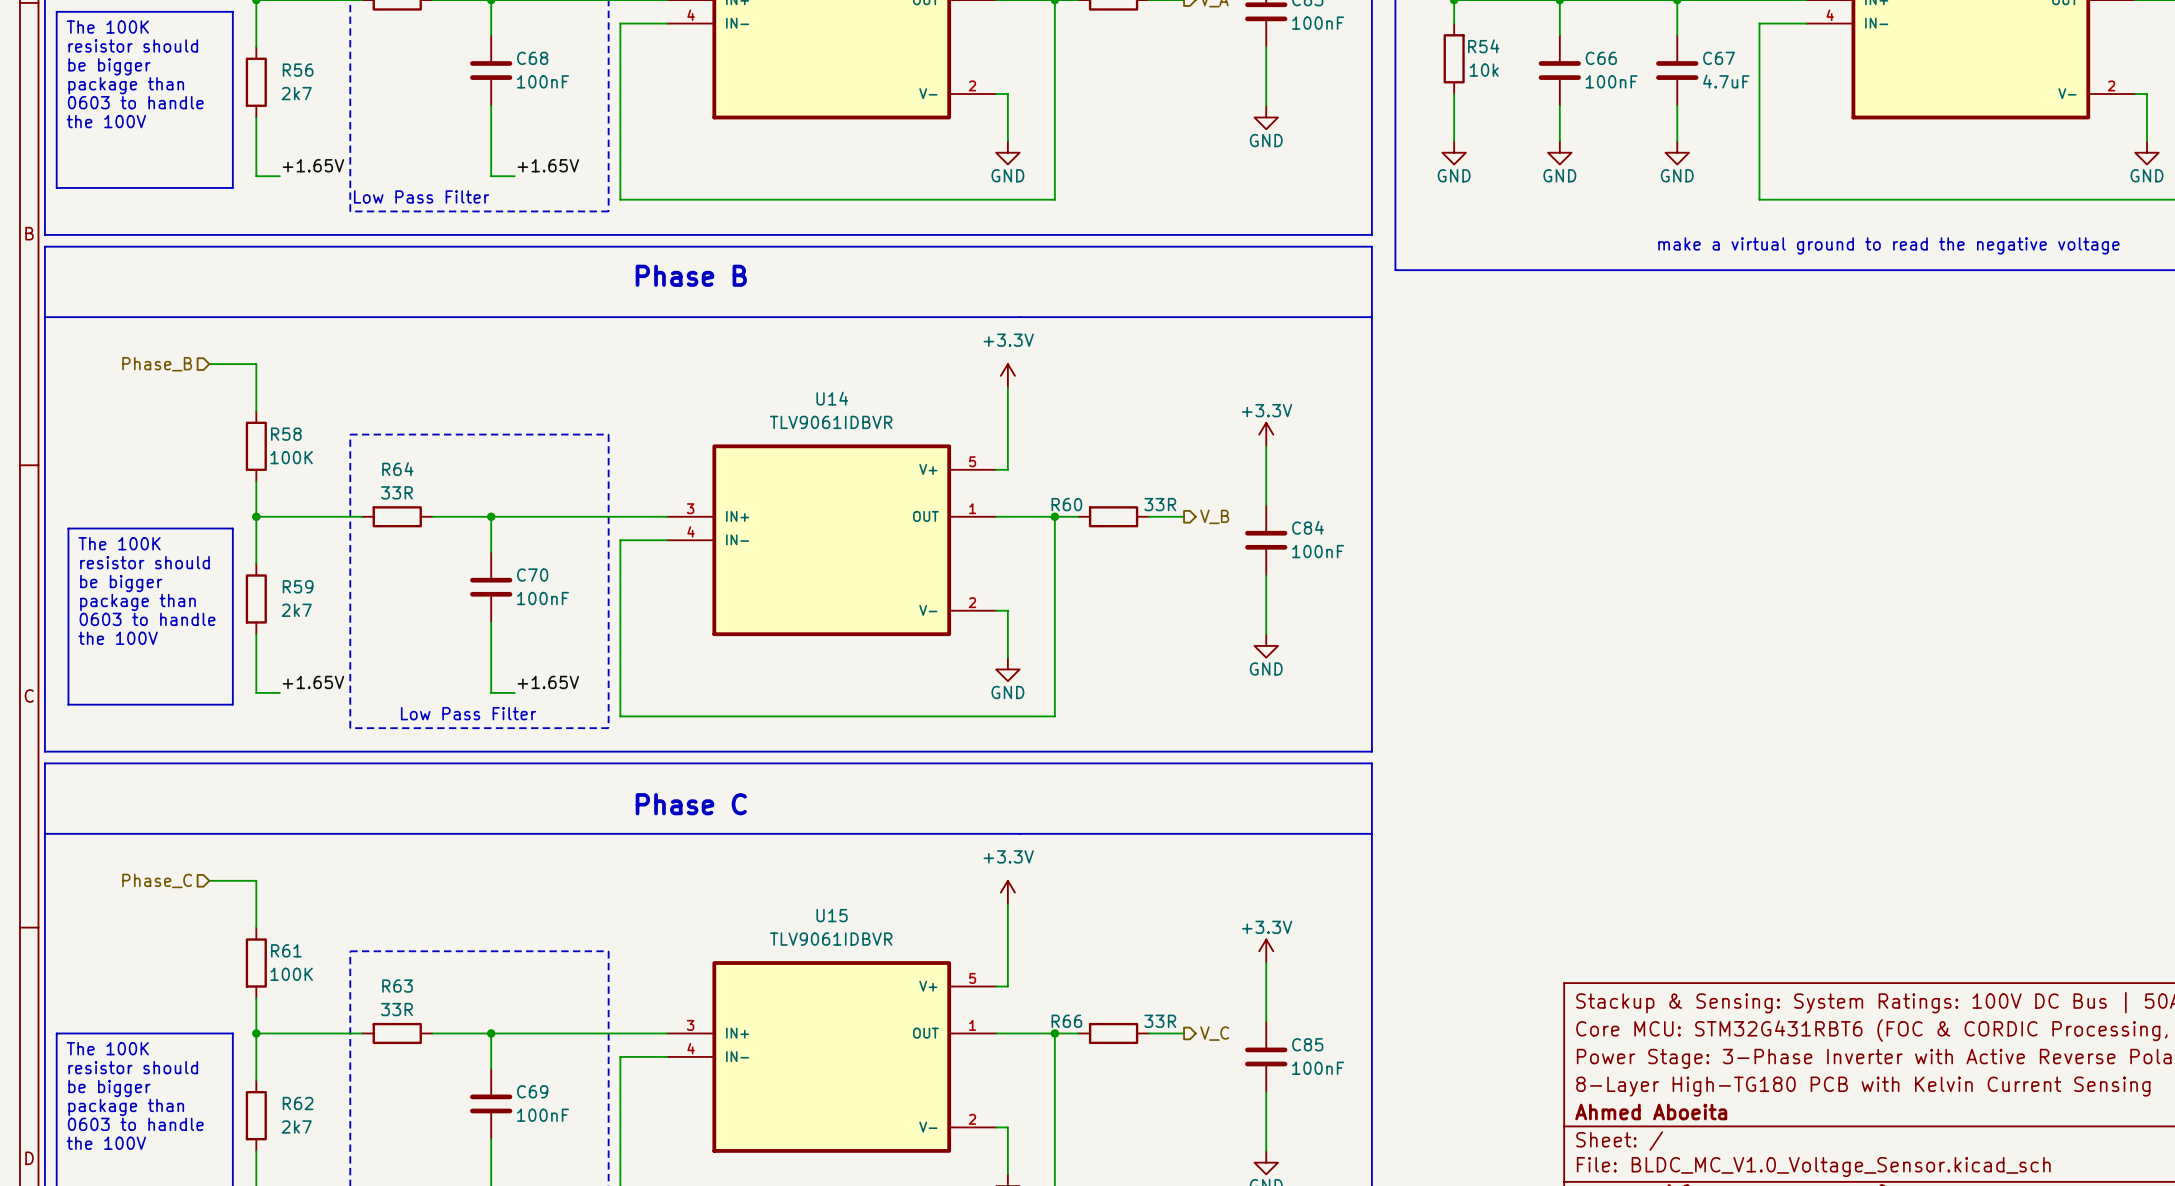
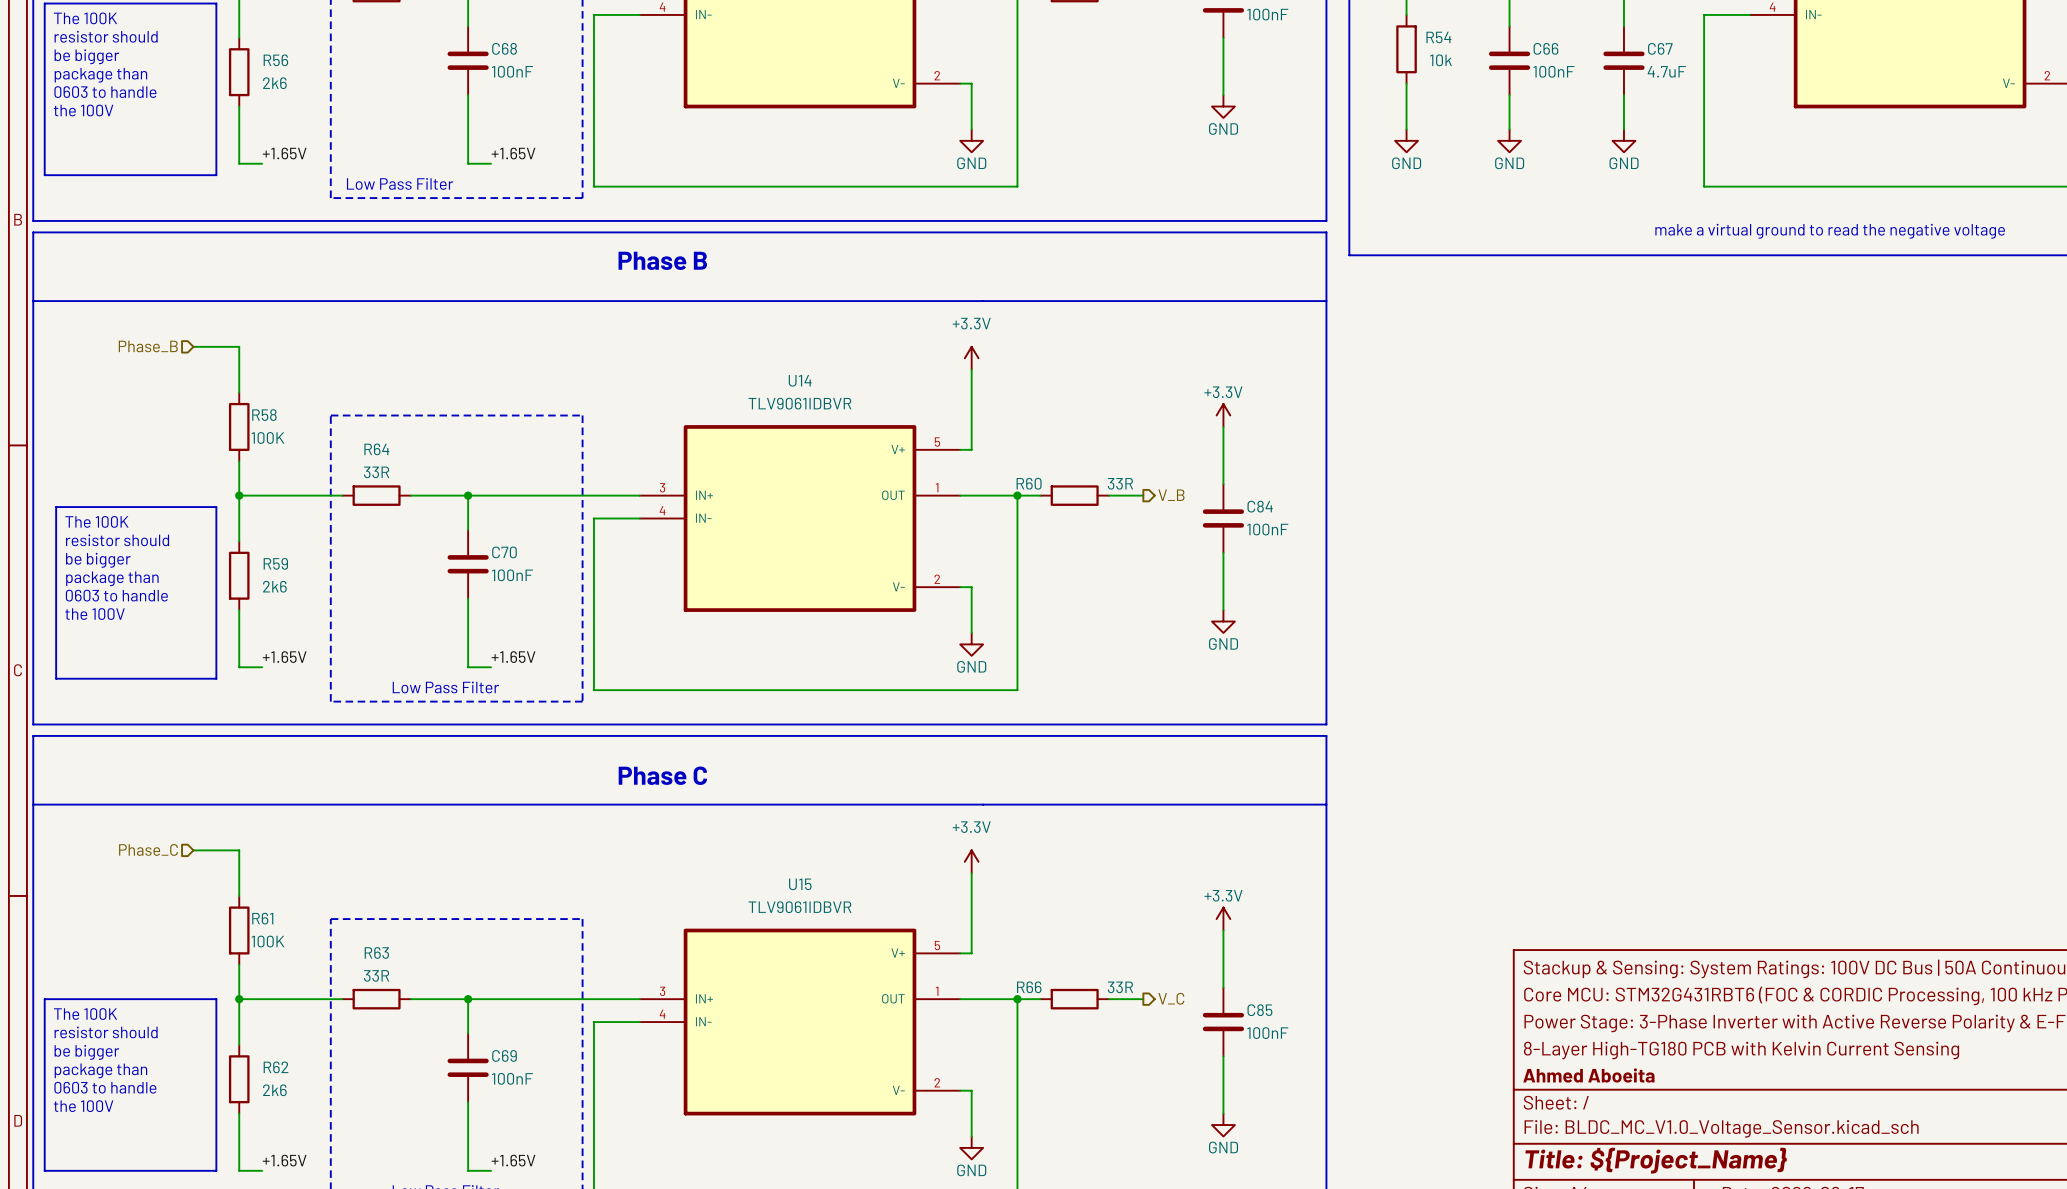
R56 value: 2k7 (296, 93) -> 2k6 (274, 83)
R59 value: 2k7 (296, 610) -> 2k6 (274, 586)
R62 value: 2k7 (296, 1126) -> 2k6 (274, 1090)

